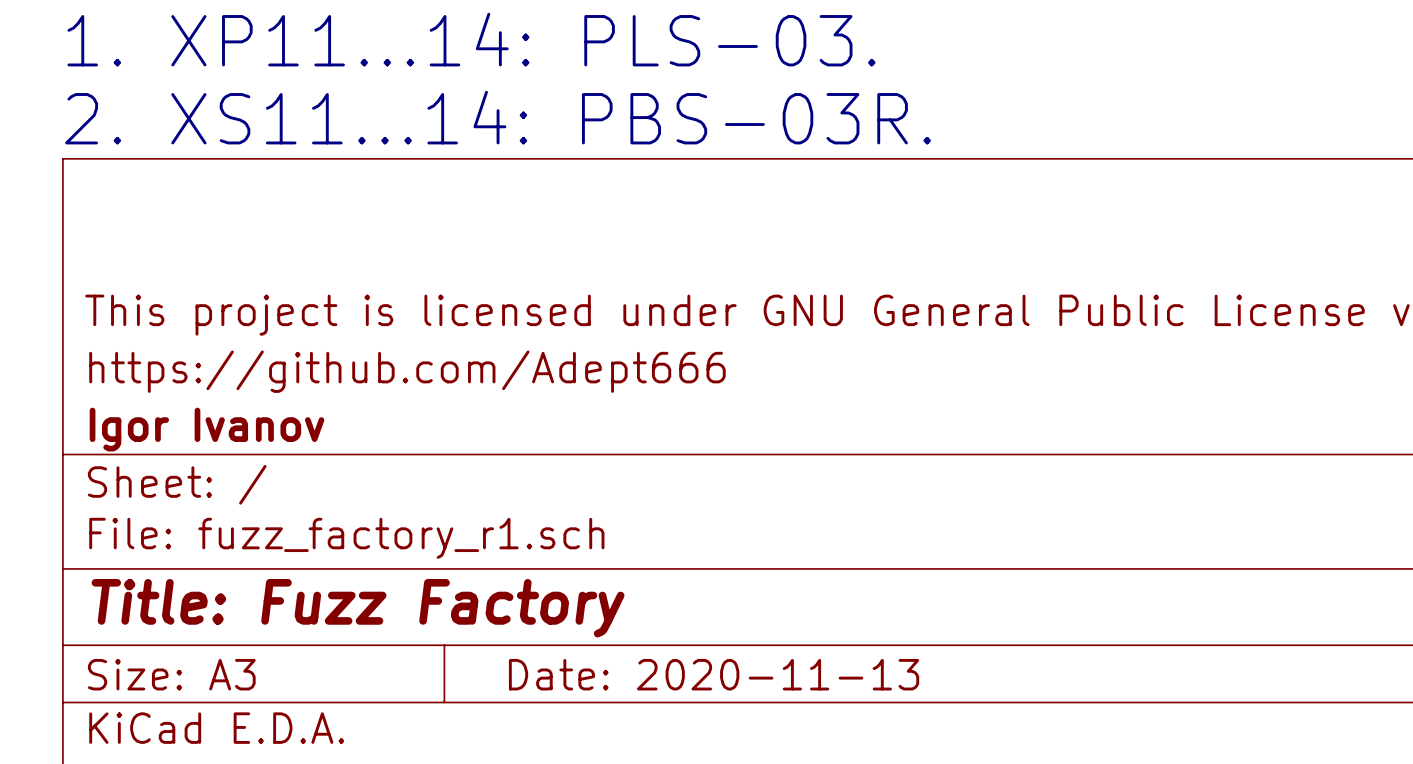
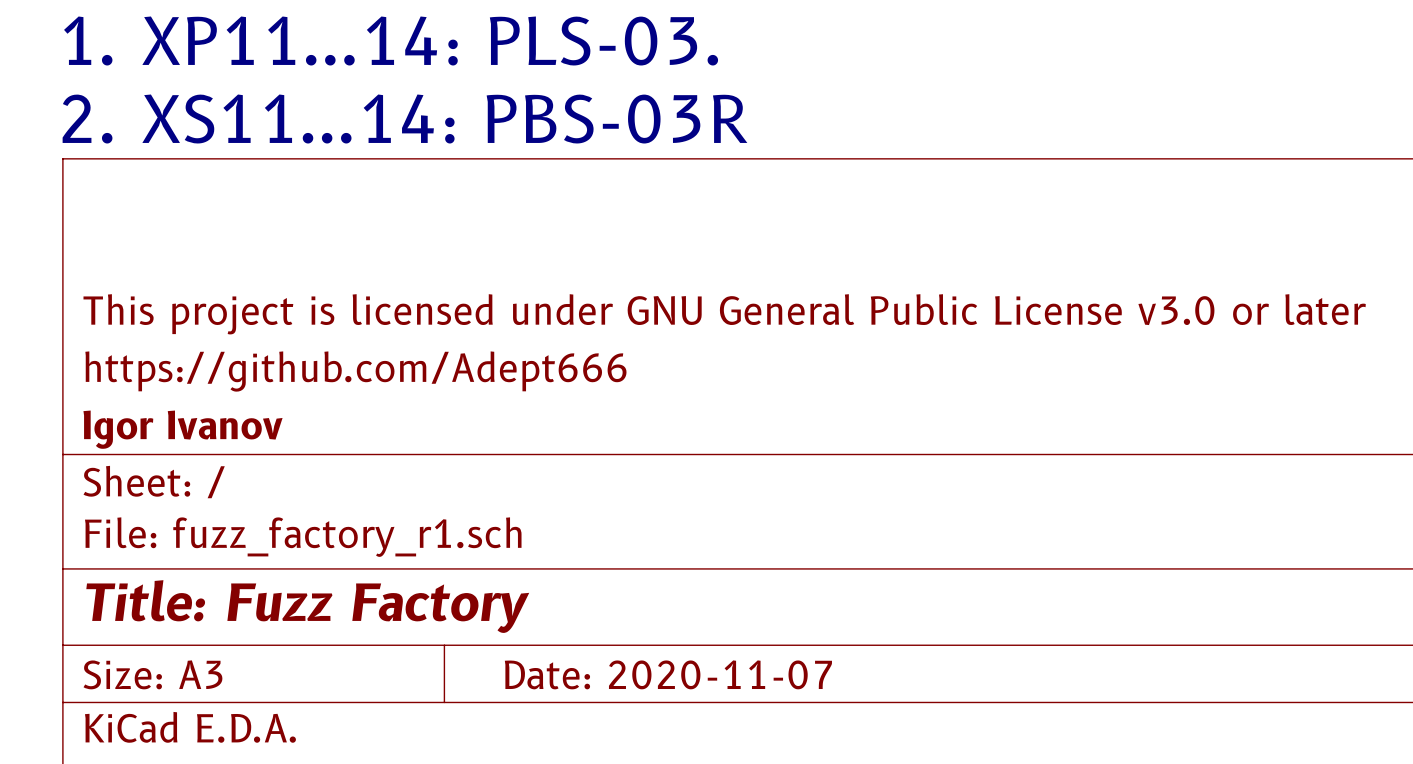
text: 2. XS11...14: PBS-03R. (498, 117) -> 2. XS11...14: PBS-03R (404, 119)
title block: Date: 2020-11-13 (714, 674) -> Date: 2020-11-07 (668, 674)

